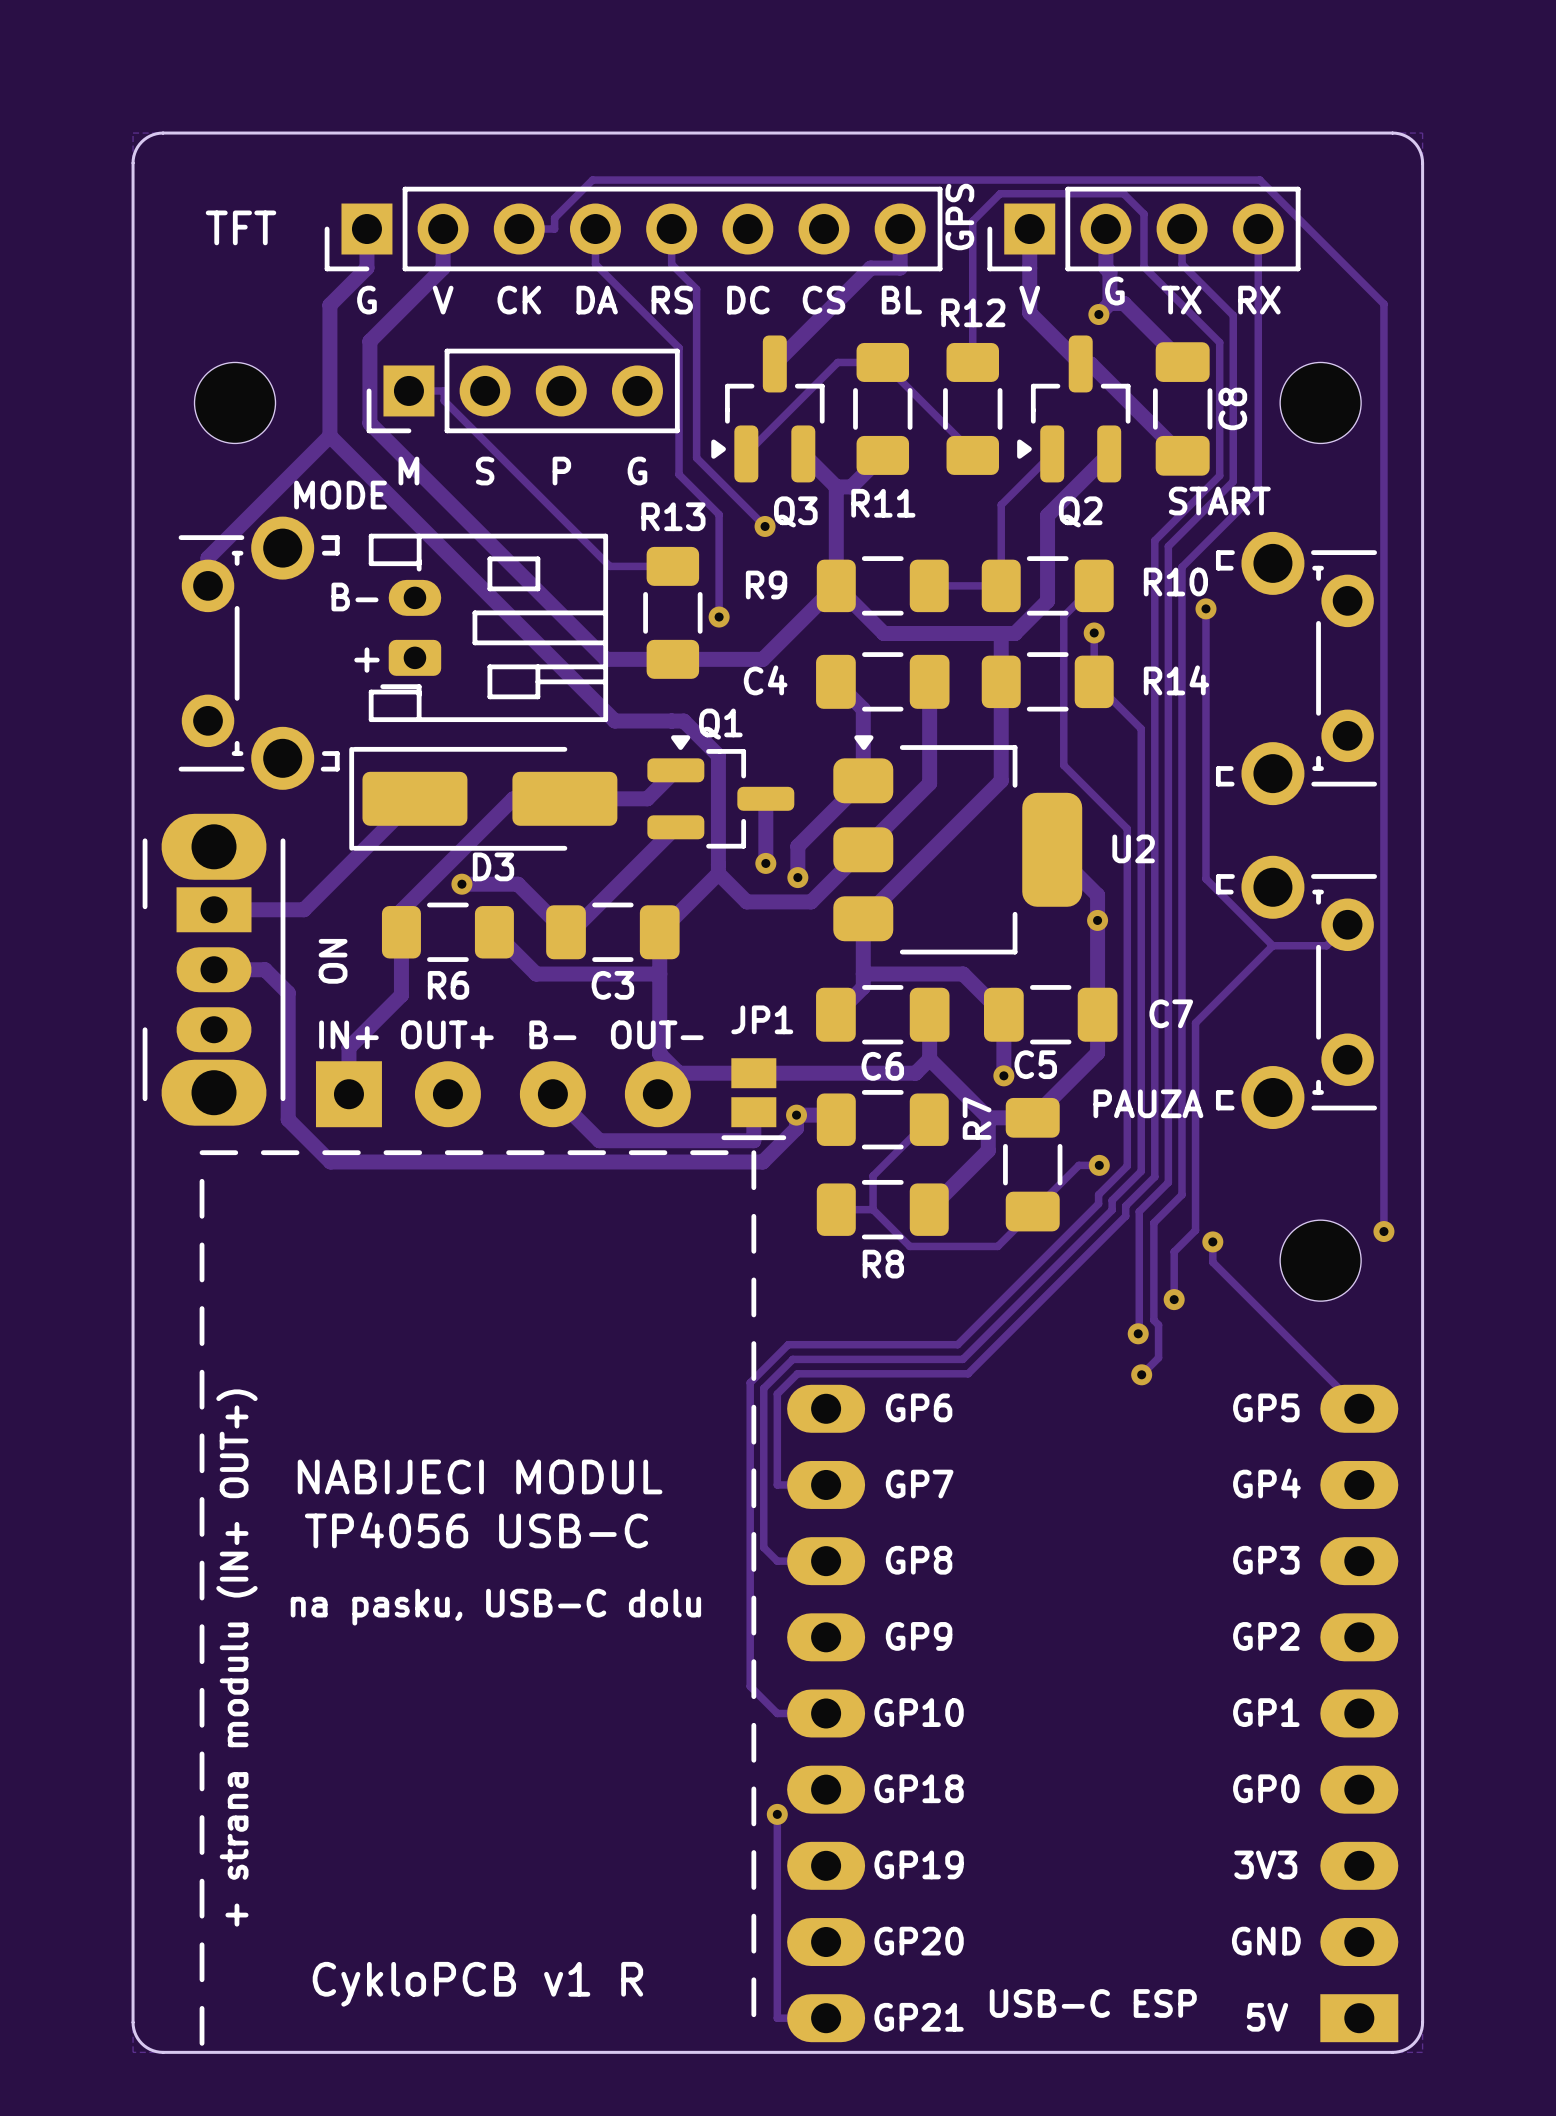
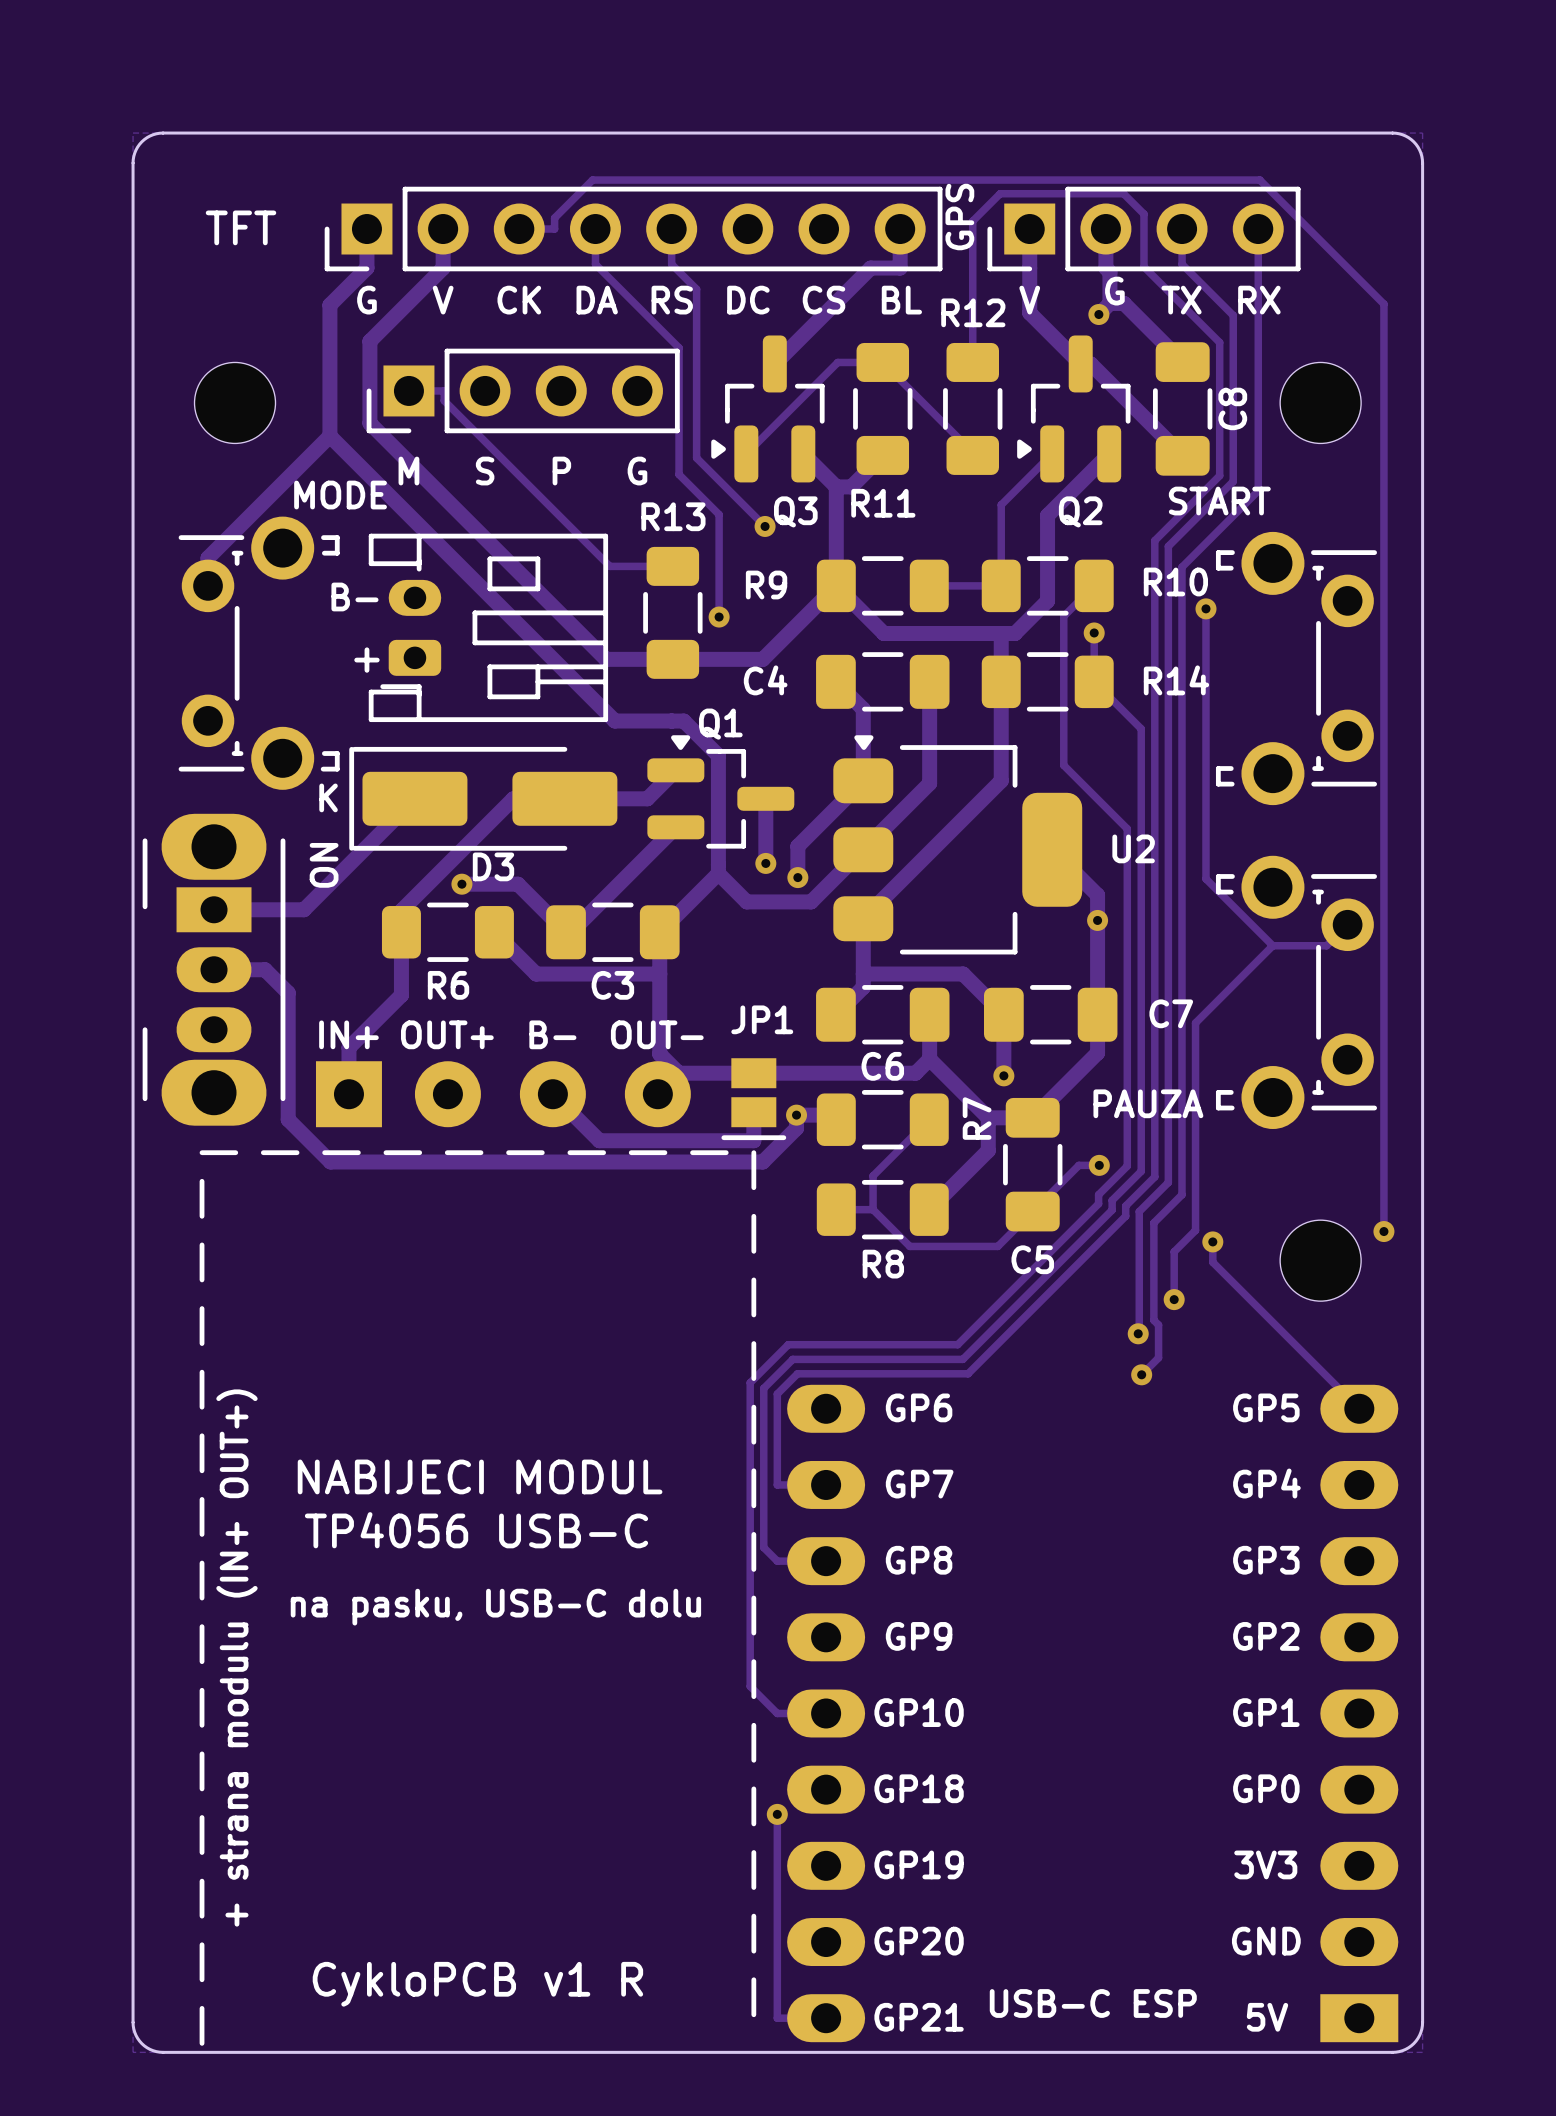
text: none -> K (328, 797)
text position: ON (333, 961) -> ON (324, 865)
text position: C5 (1035, 1064) -> C5 (1032, 1259)

